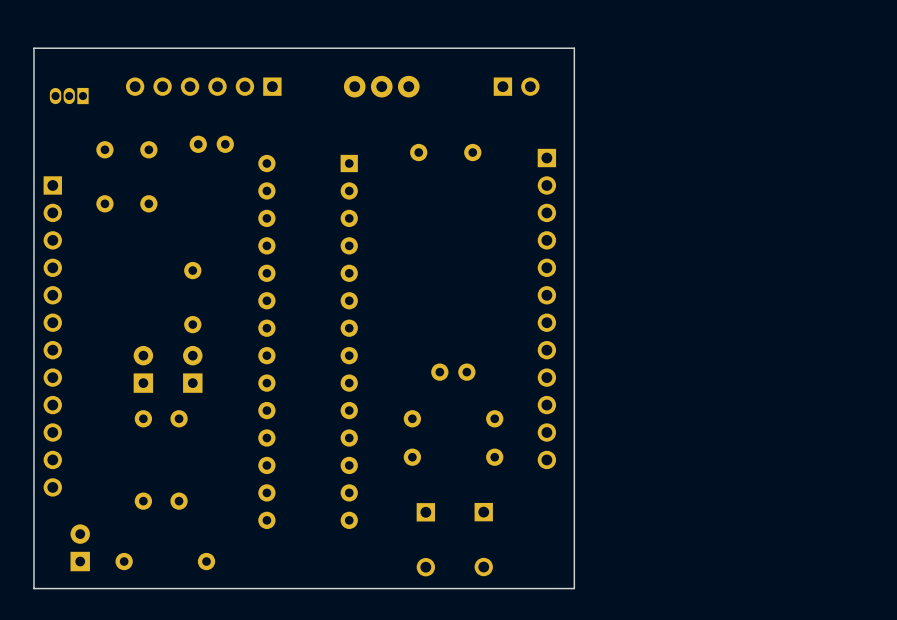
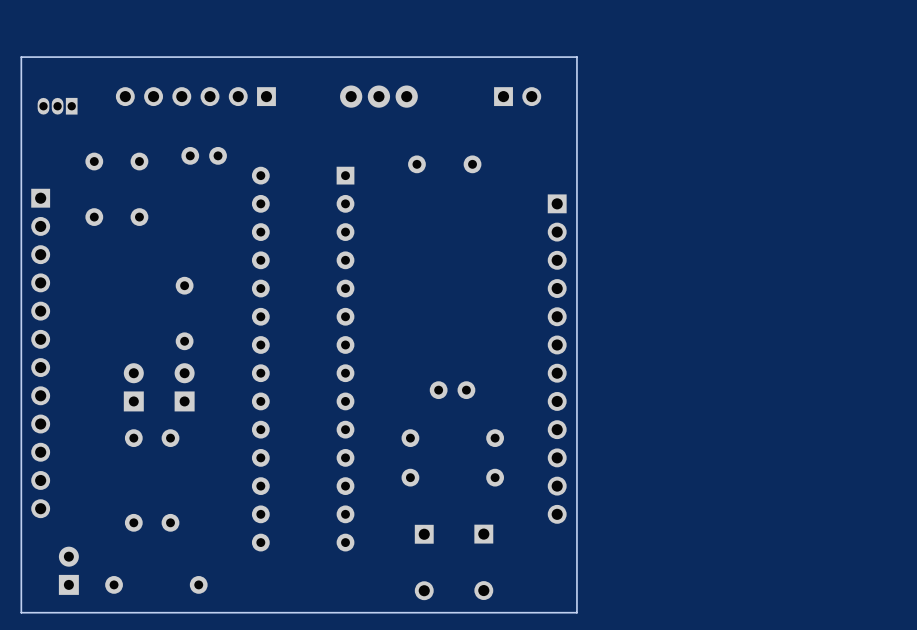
part position: (546, 308) -> (557, 359)

